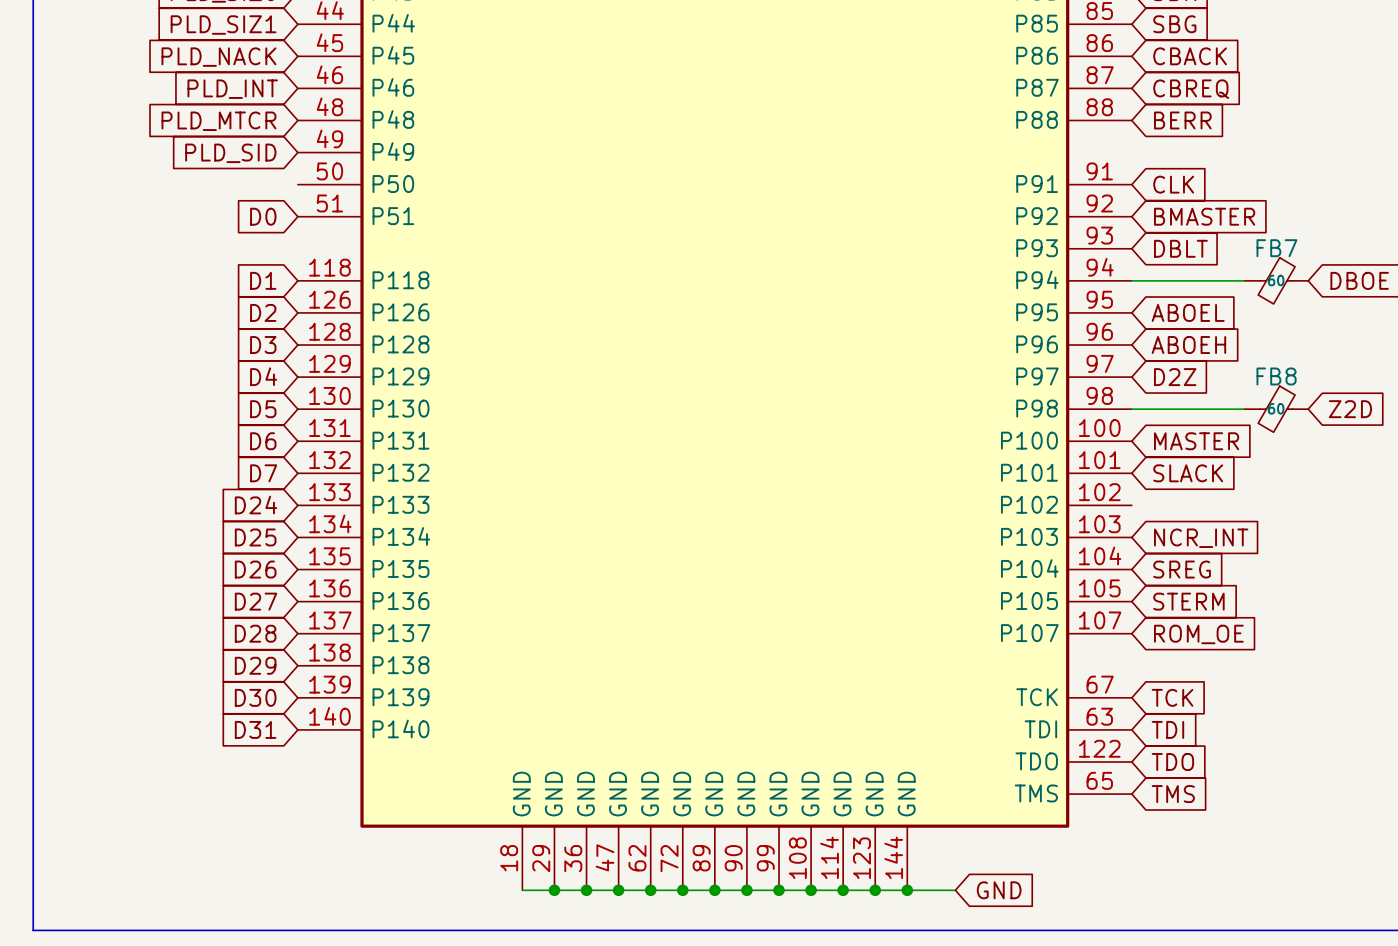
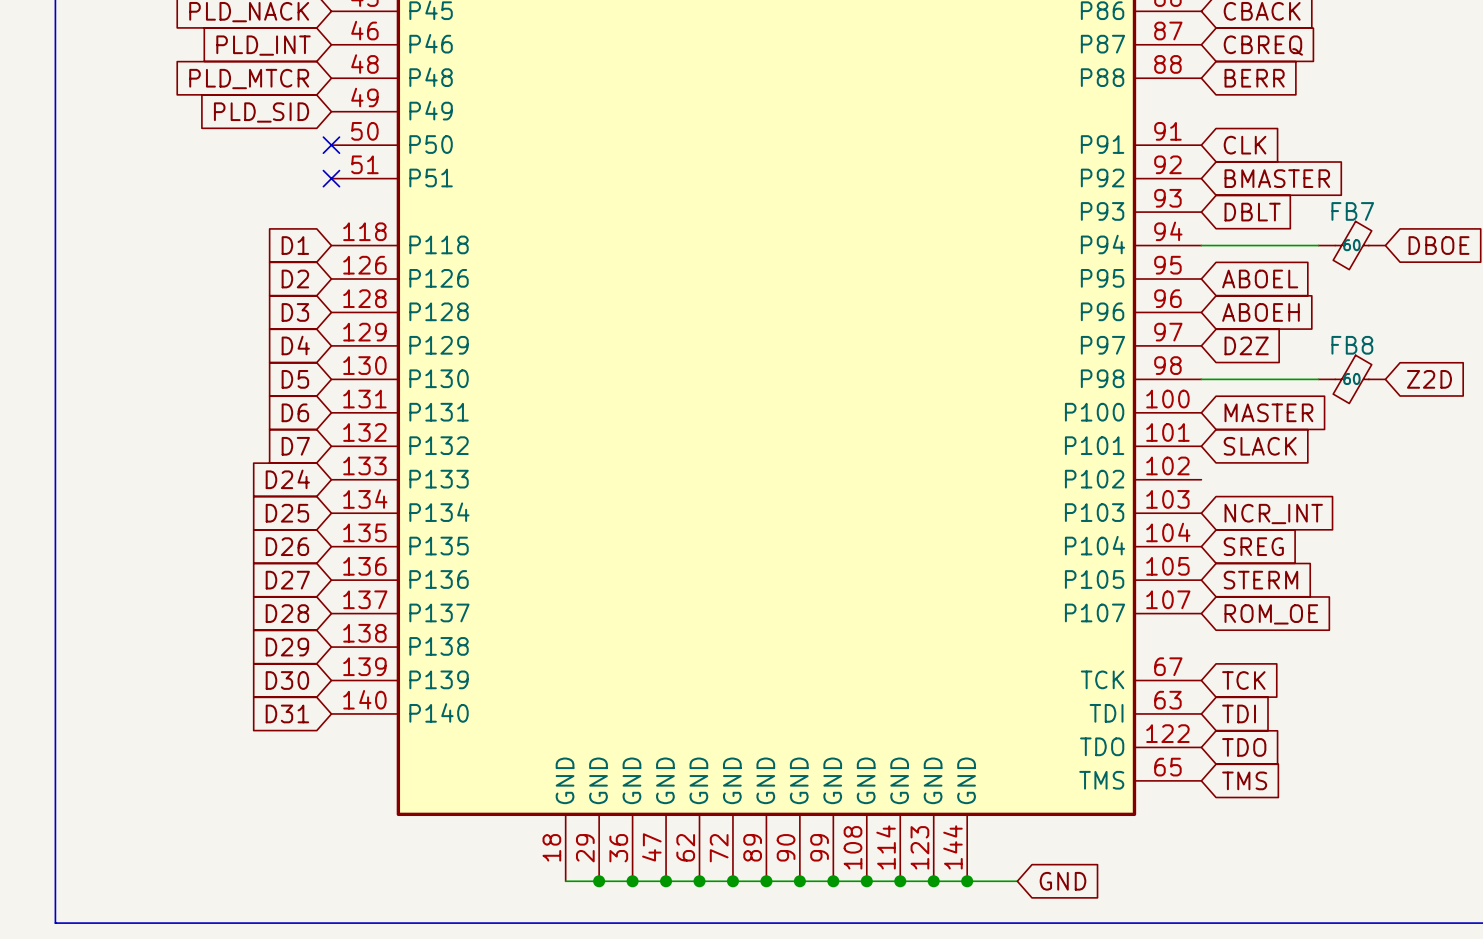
no-connect mark: none -> (331, 145)
global label: D0 (263, 216) -> none
no-connect mark: none -> (331, 178)

